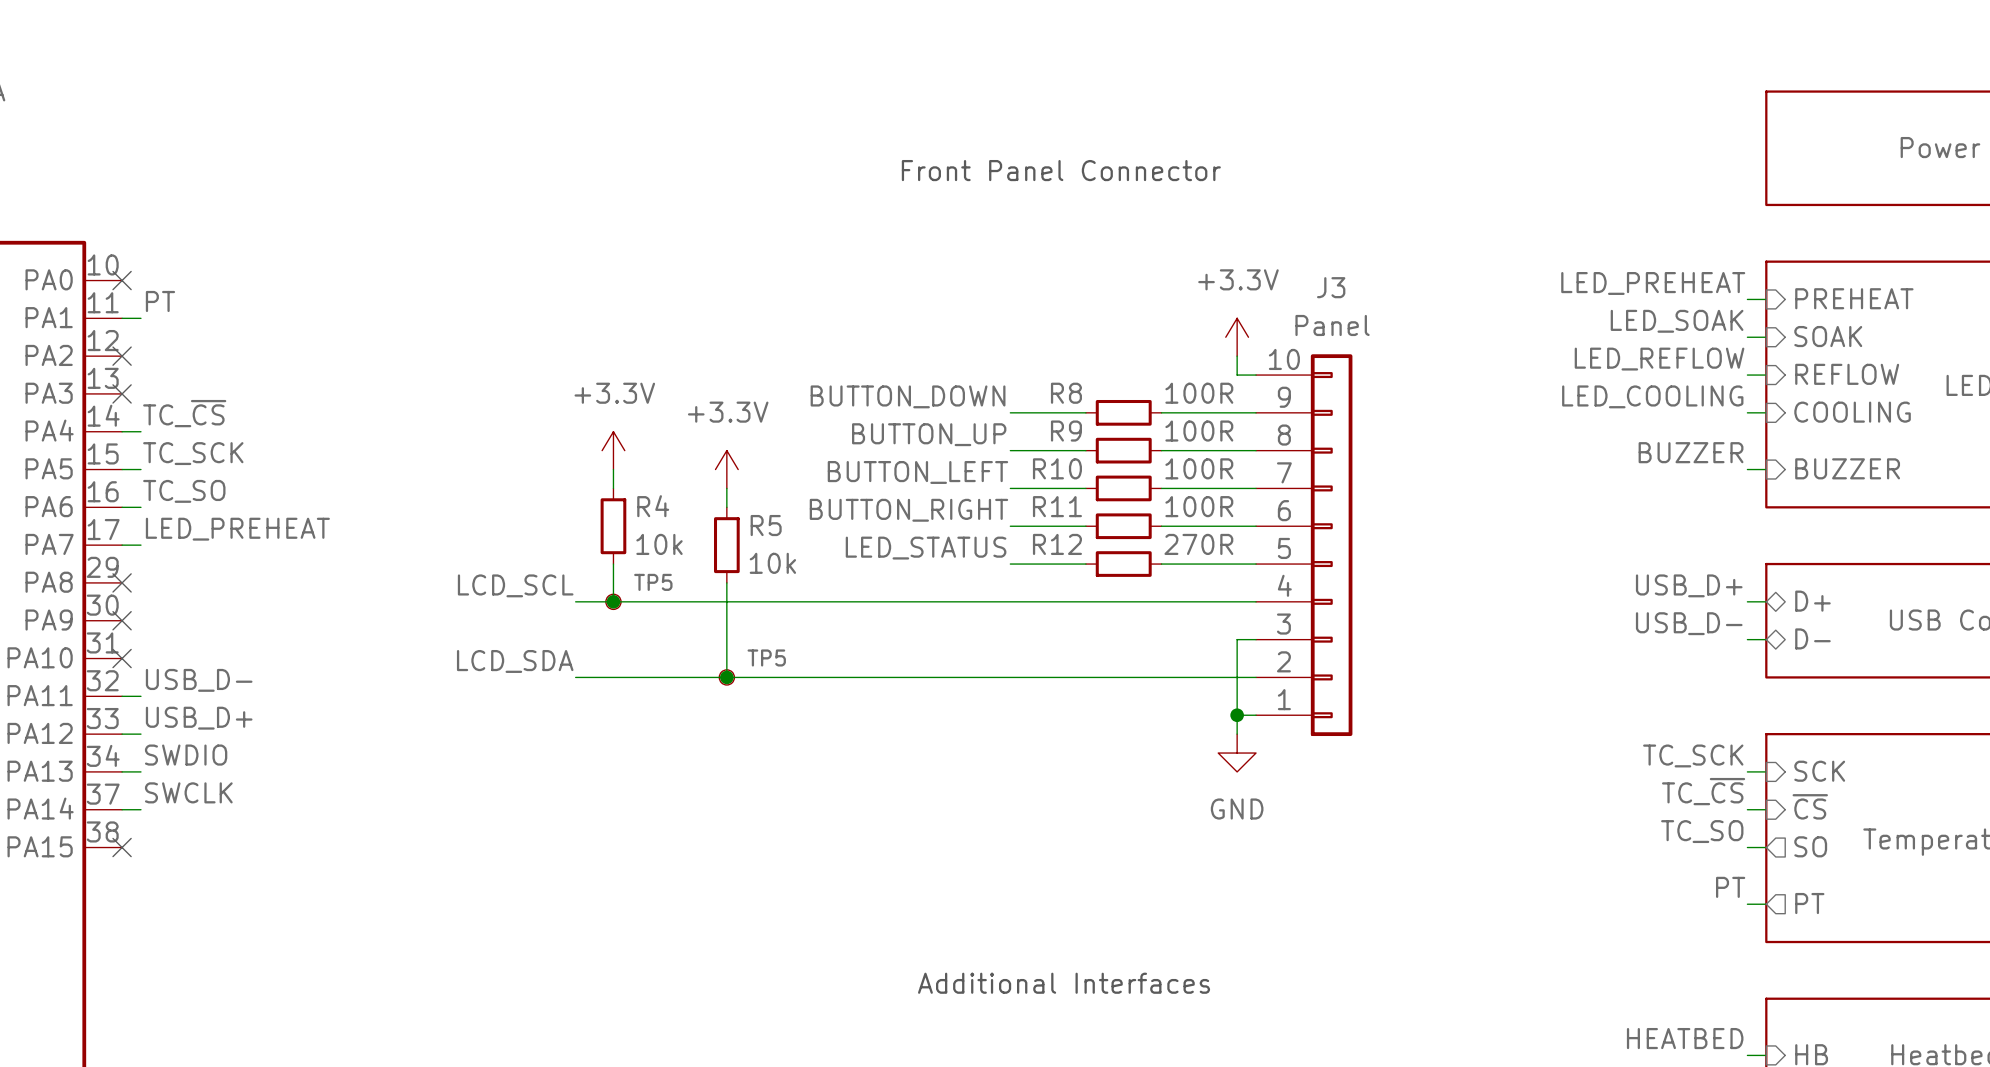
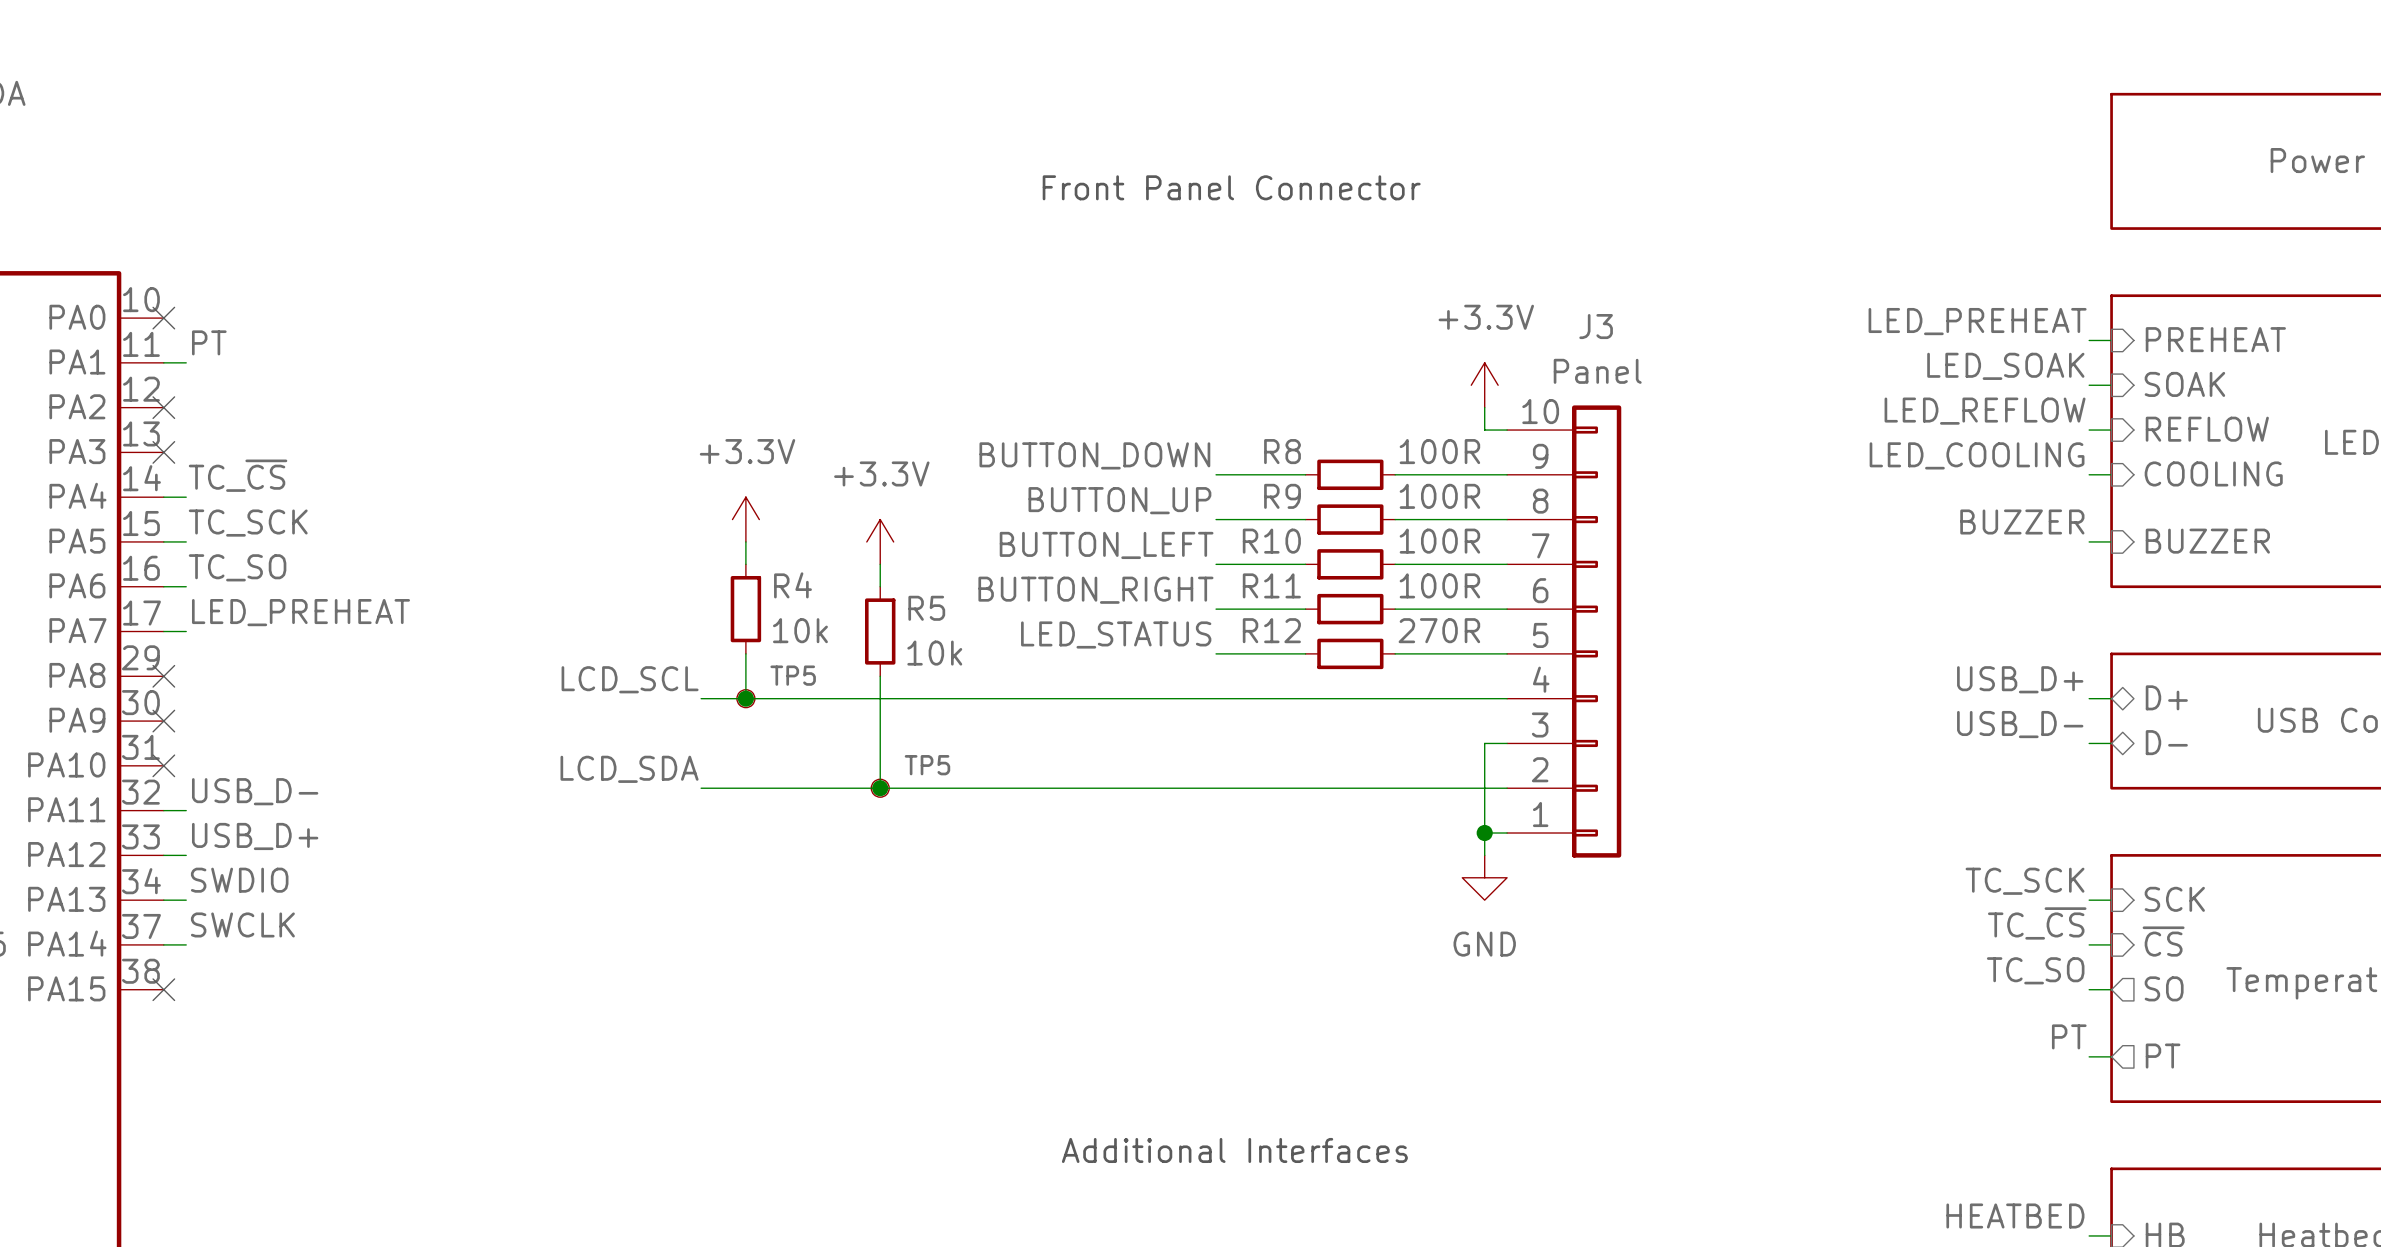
text position: Front Panel Connector (1061, 170) -> Front Panel Connector (1231, 187)
text position: Additional Interfaces (1064, 983) -> Additional Interfaces (1234, 1150)

